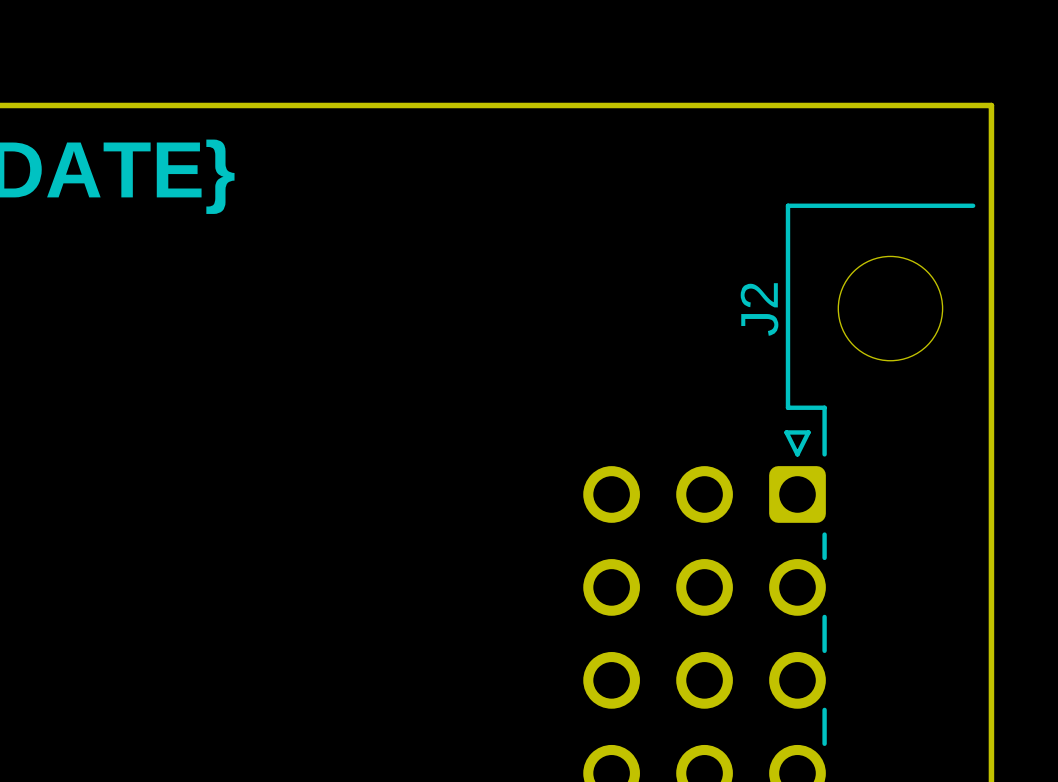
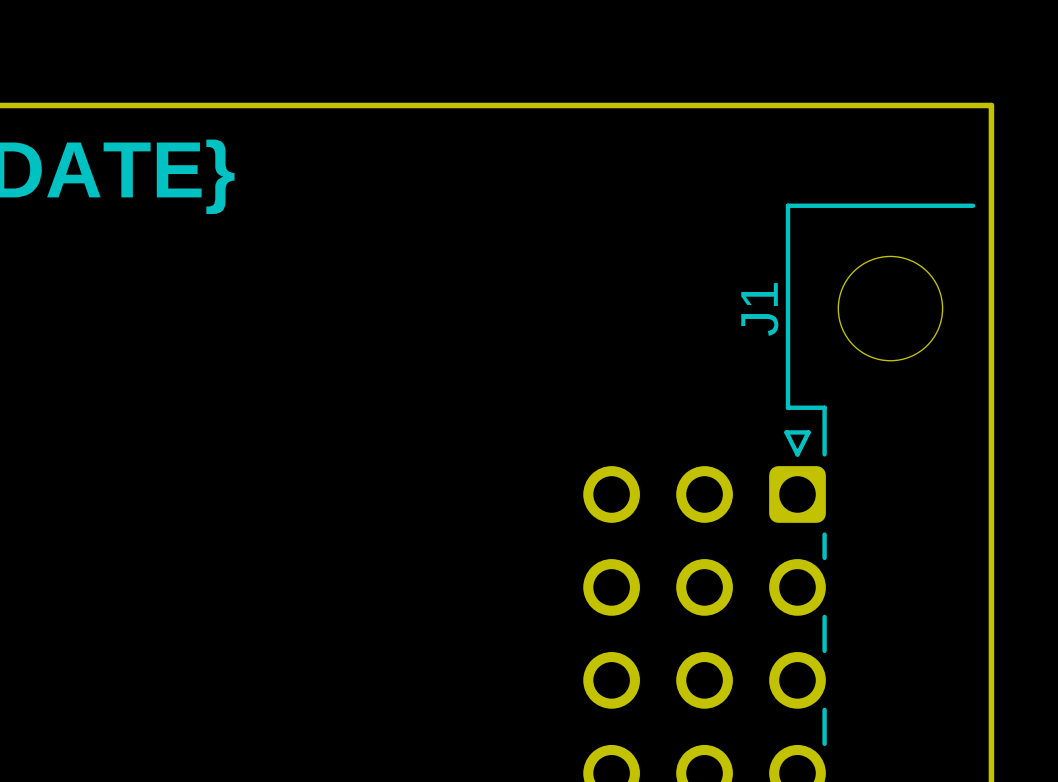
J2 name: J2 (759, 309) -> J1 (759, 309)

